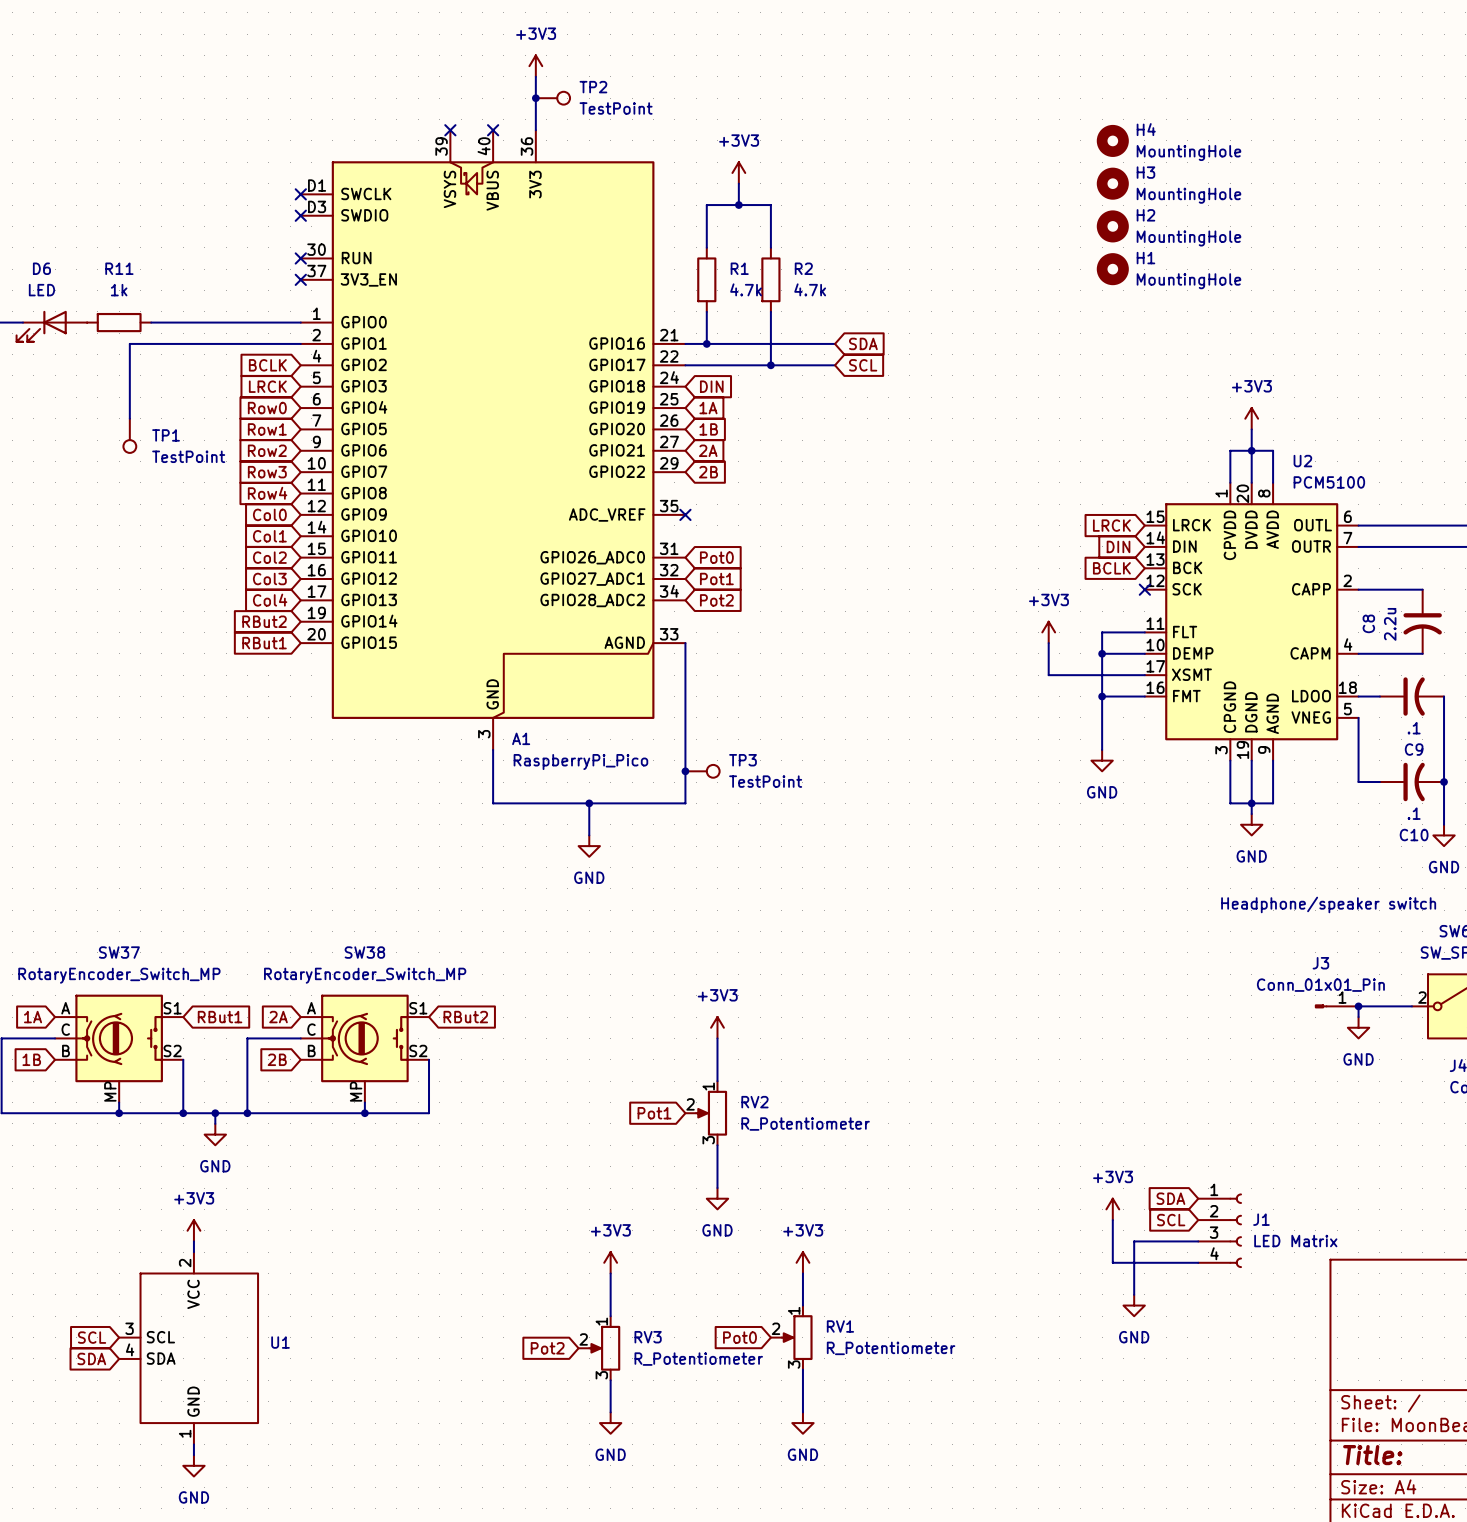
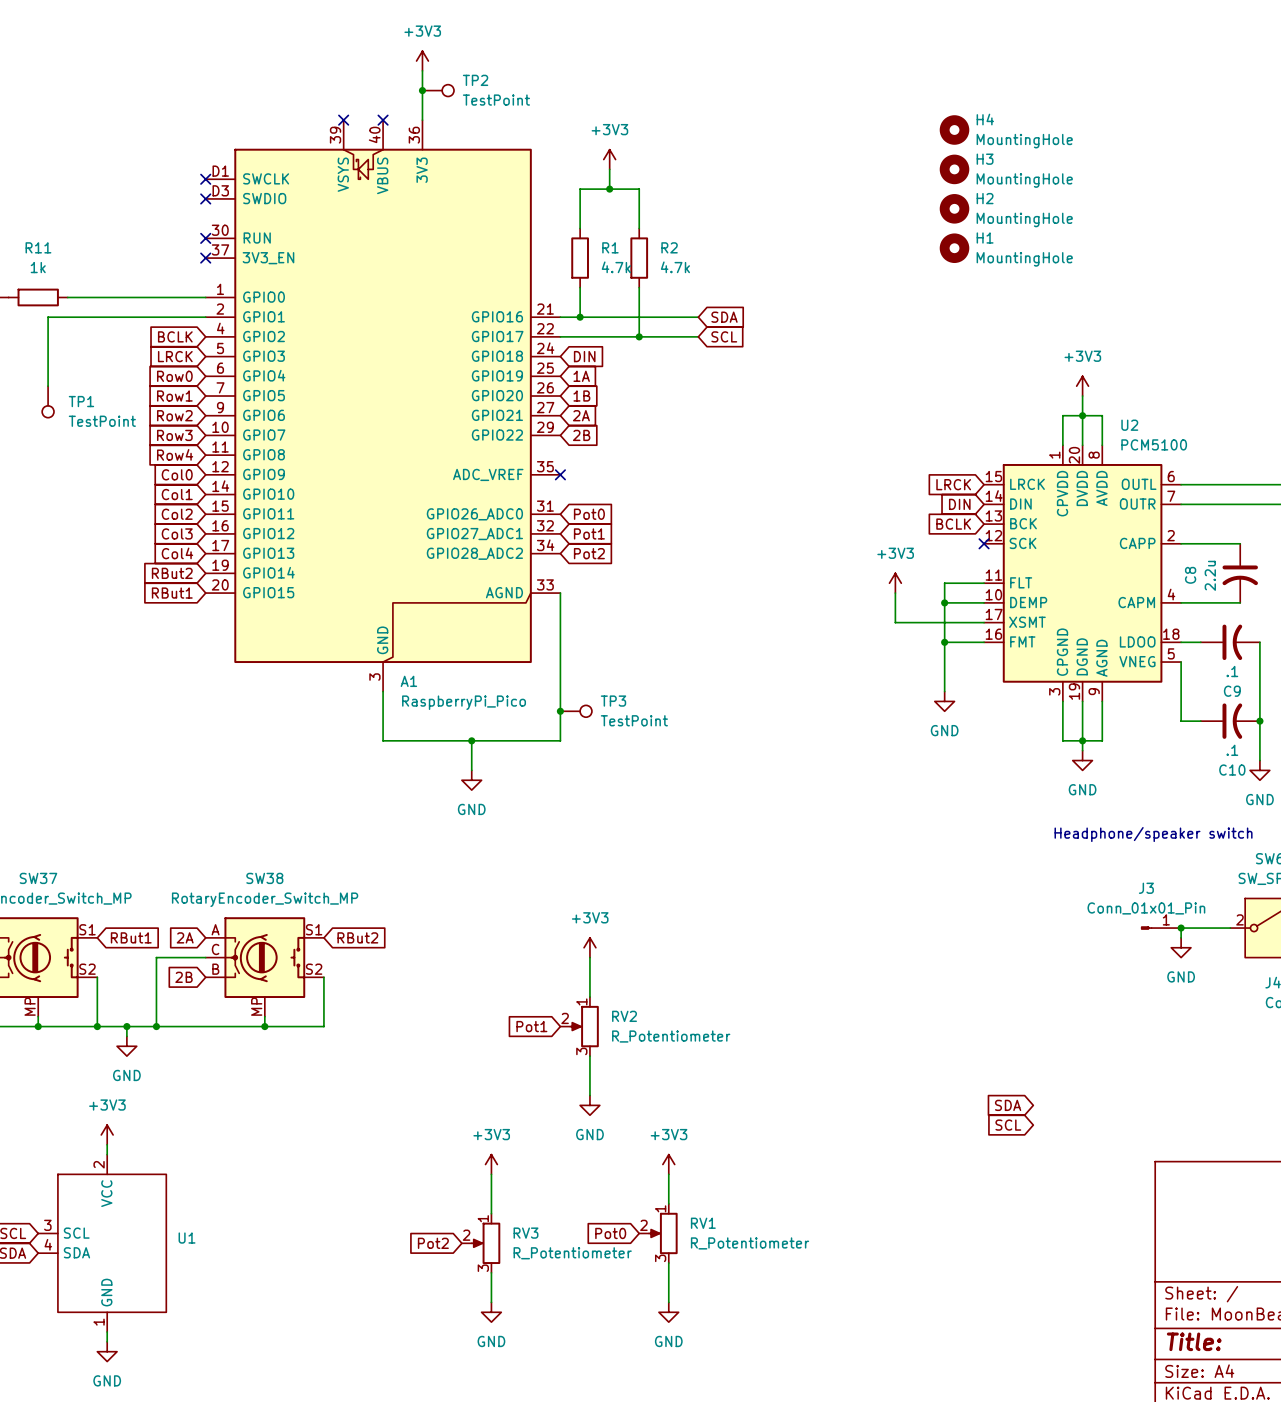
power symbol: +3V3 (1112, 1209) -> none
wire: (1112, 1220) (1112, 1262) (1198, 1262) -> none
J1: LED Matrix (1219, 1230) -> none
wire: (1198, 1241) (1134, 1241) (1134, 1294) -> none
power symbol: GND (1134, 1305) -> none

